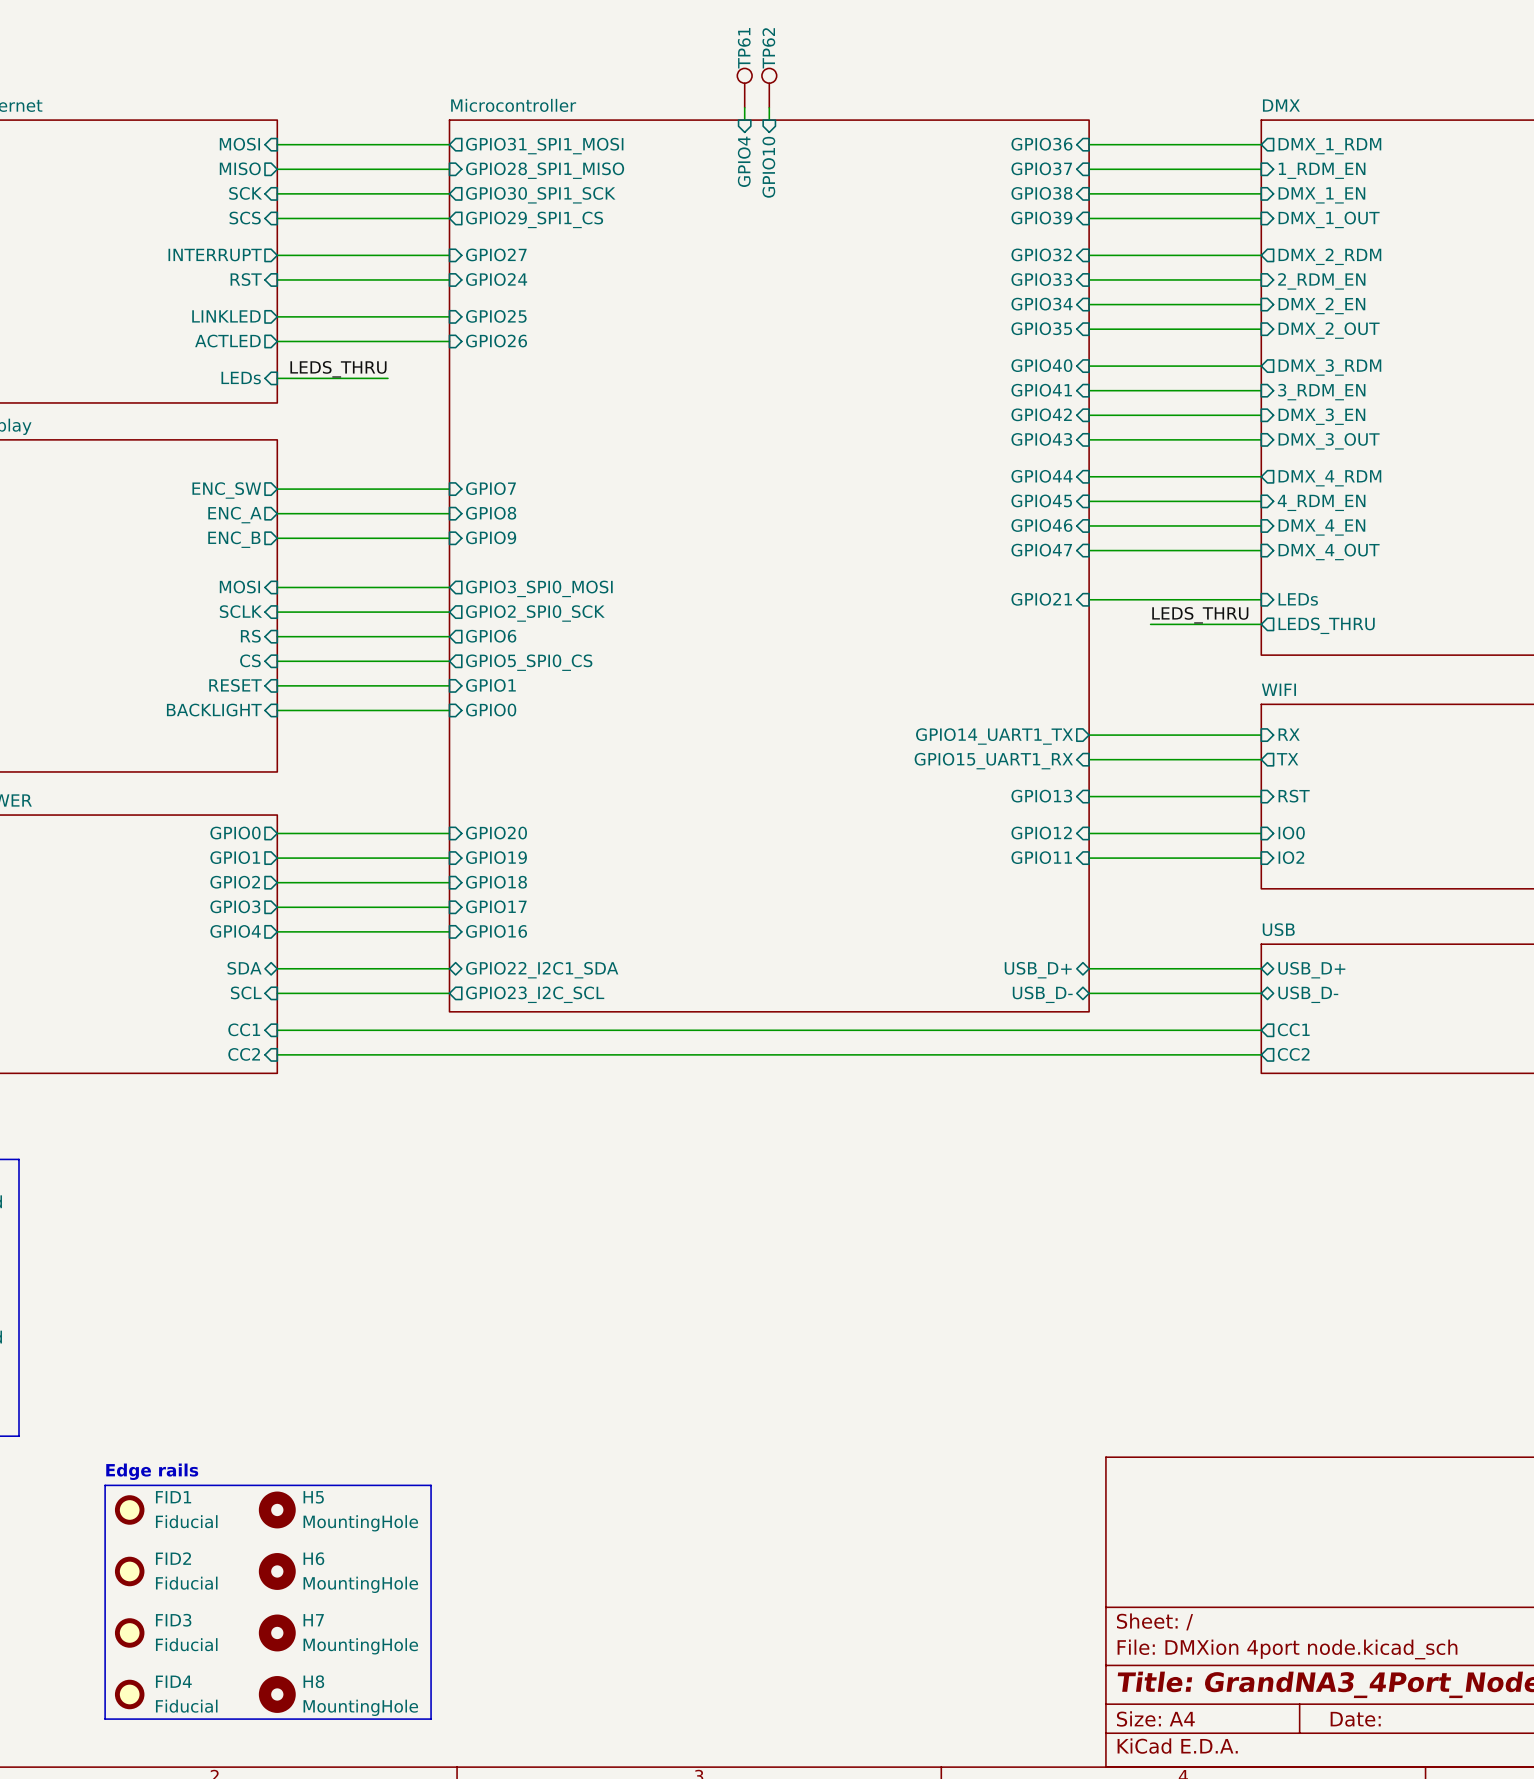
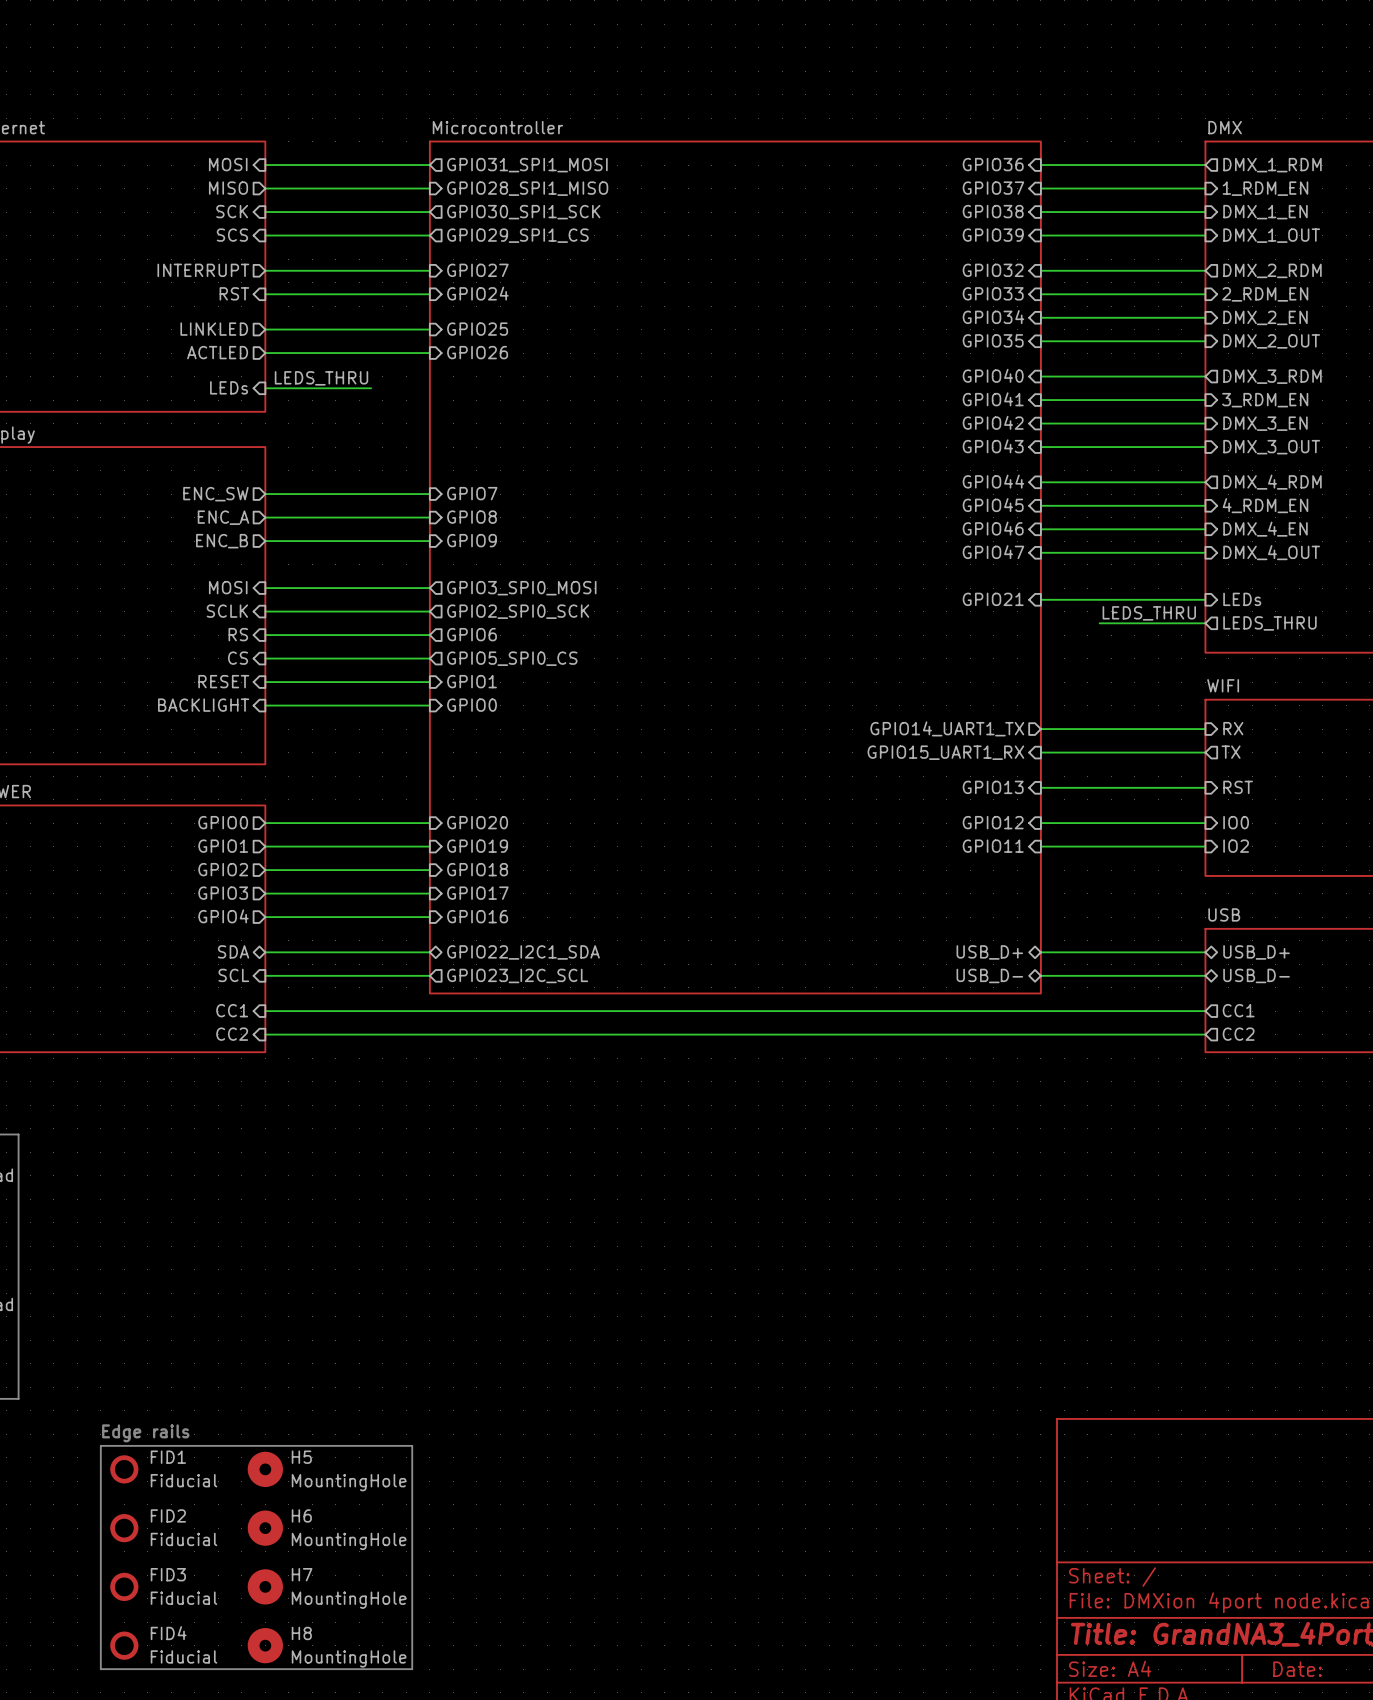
TP61: (744, 88) -> none
TP62: (769, 88) -> none
wire: (744, 107) (744, 120) -> none
wire: (769, 107) (769, 120) -> none
sheet pin: GPIO4 (744, 161) -> none
sheet pin: GPIO10 (768, 167) -> none

